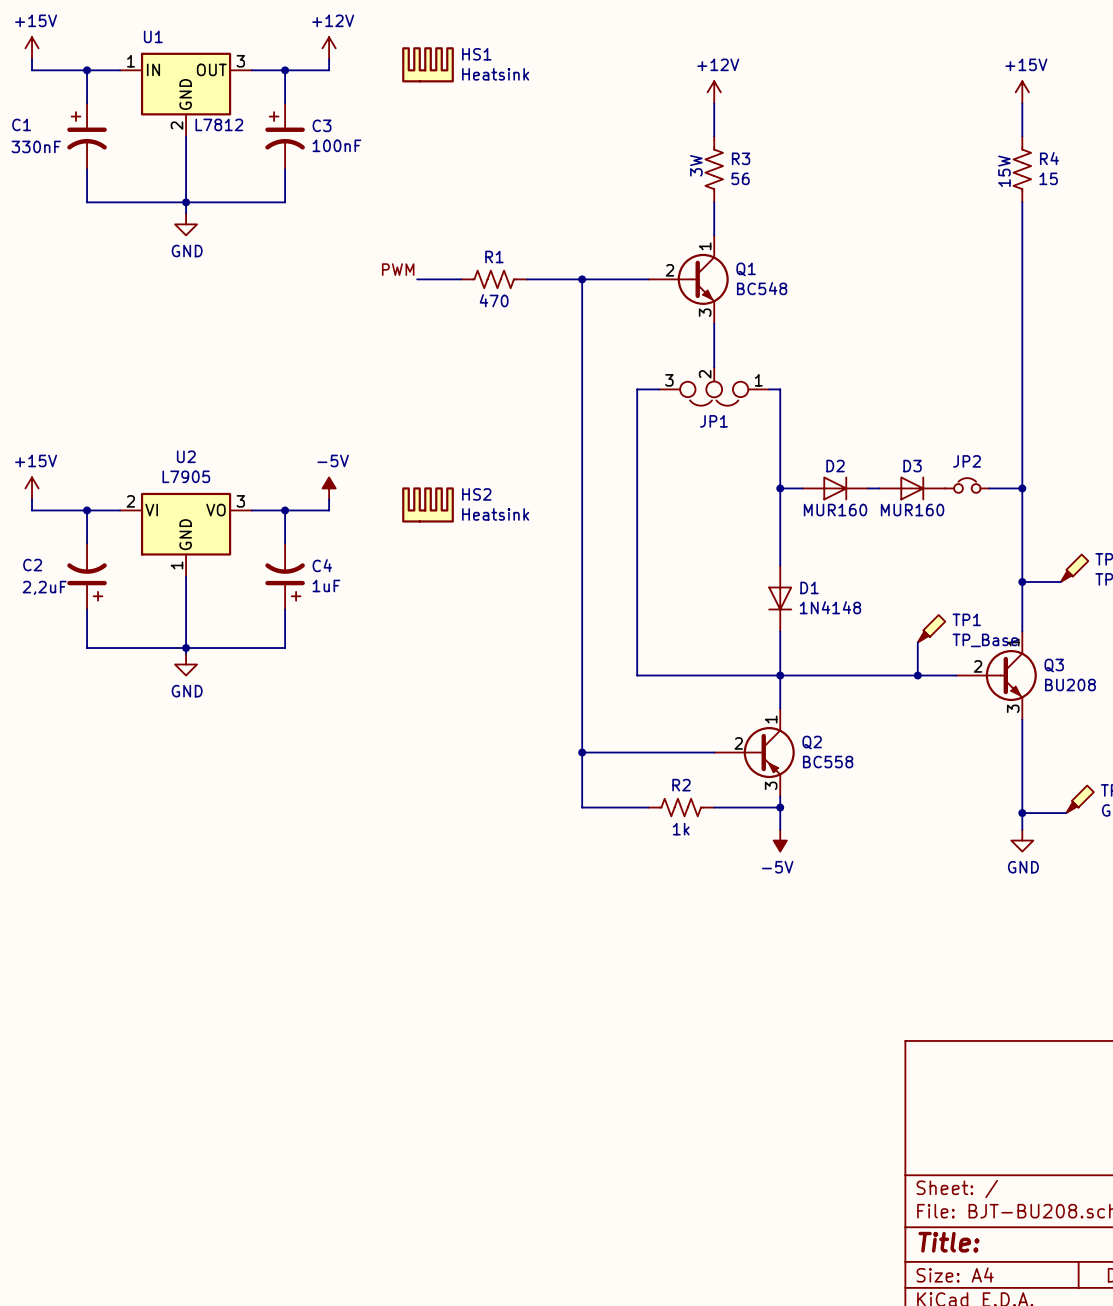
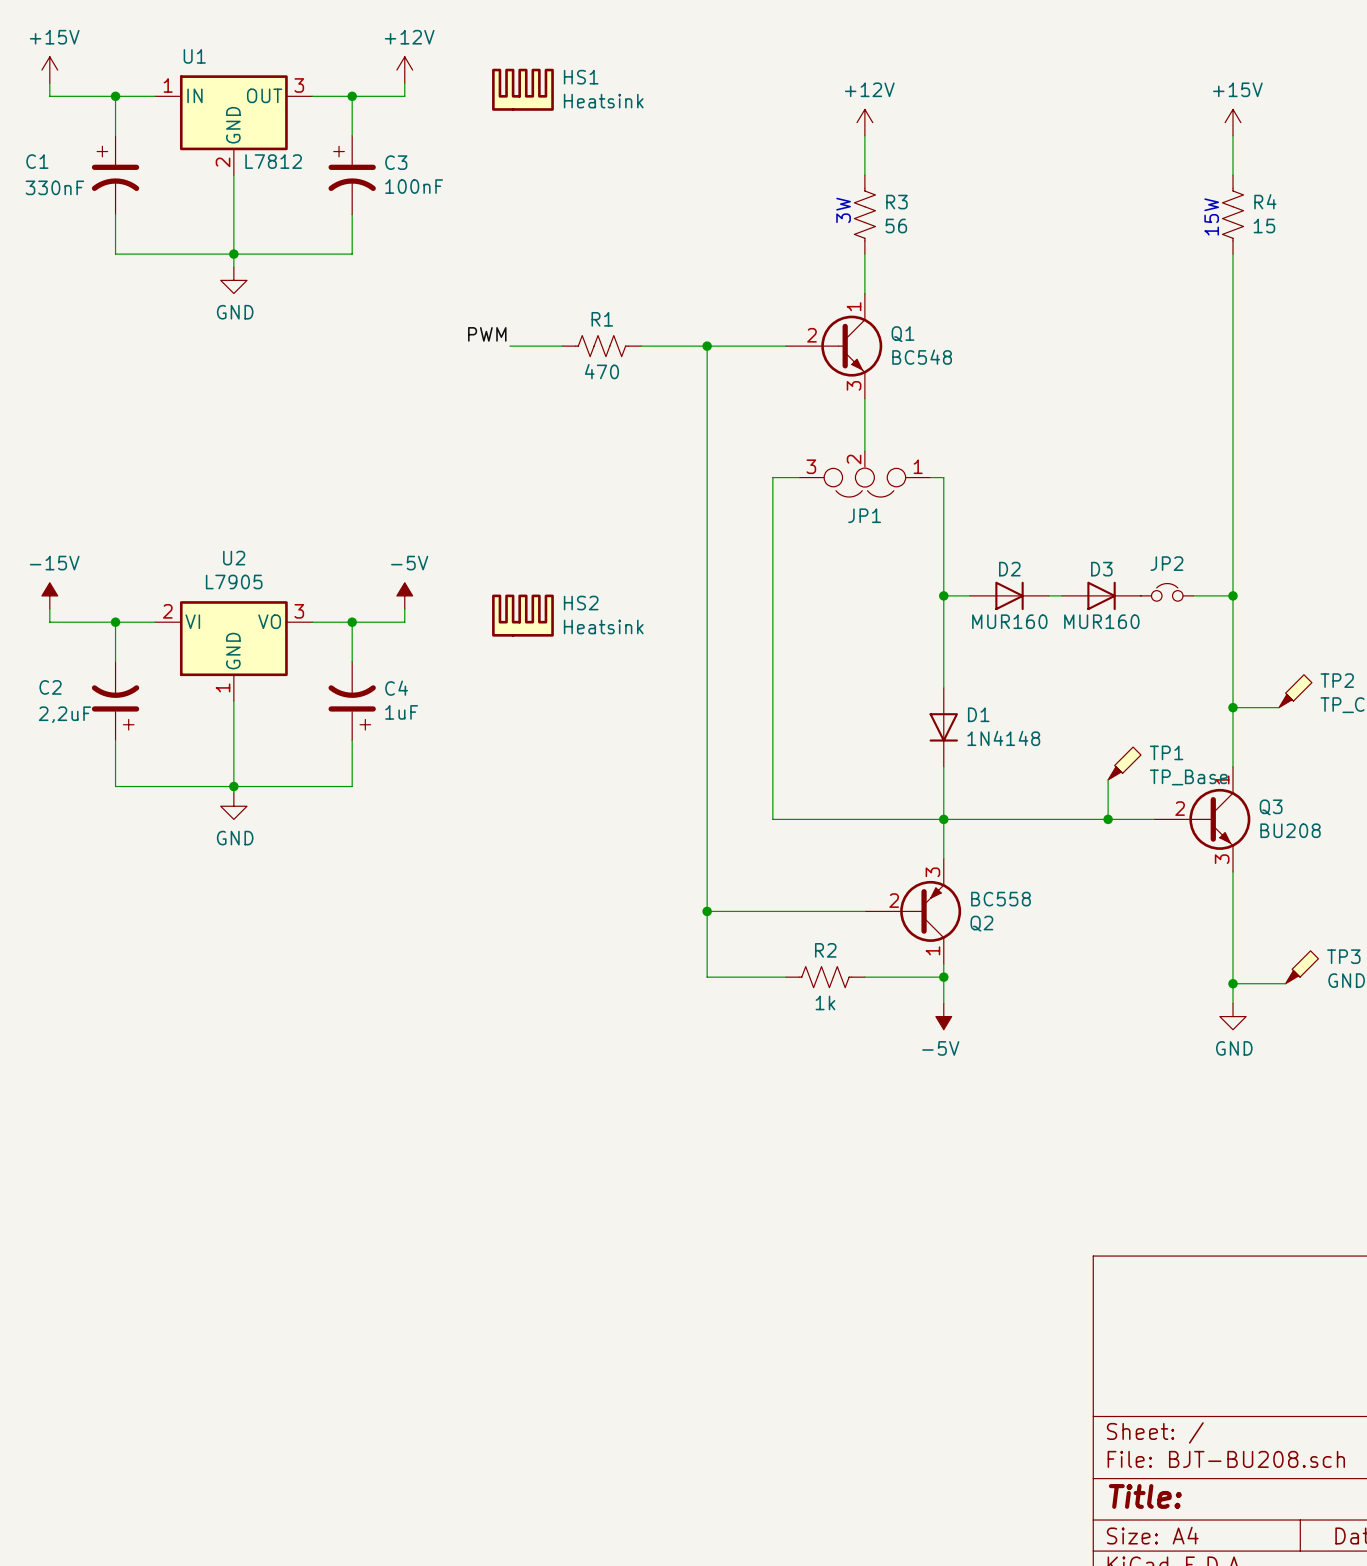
power symbol: +15V (32, 488) -> -15V (49, 595)
Q2 flip: as is (769, 752) -> up-down (930, 911)

